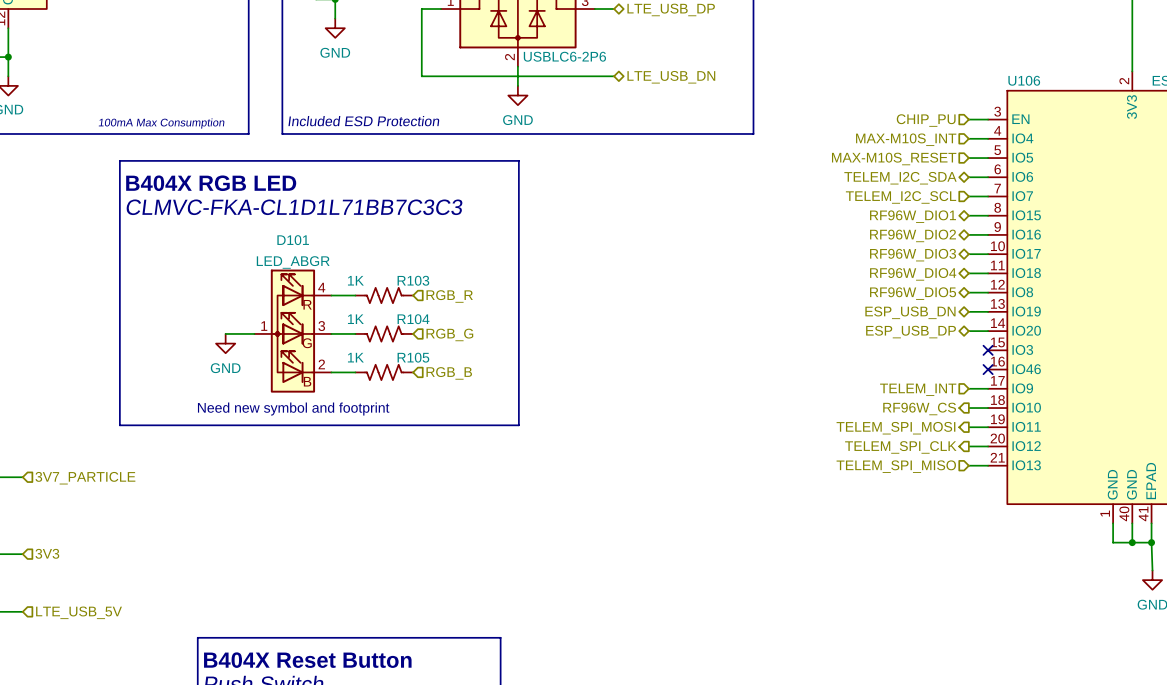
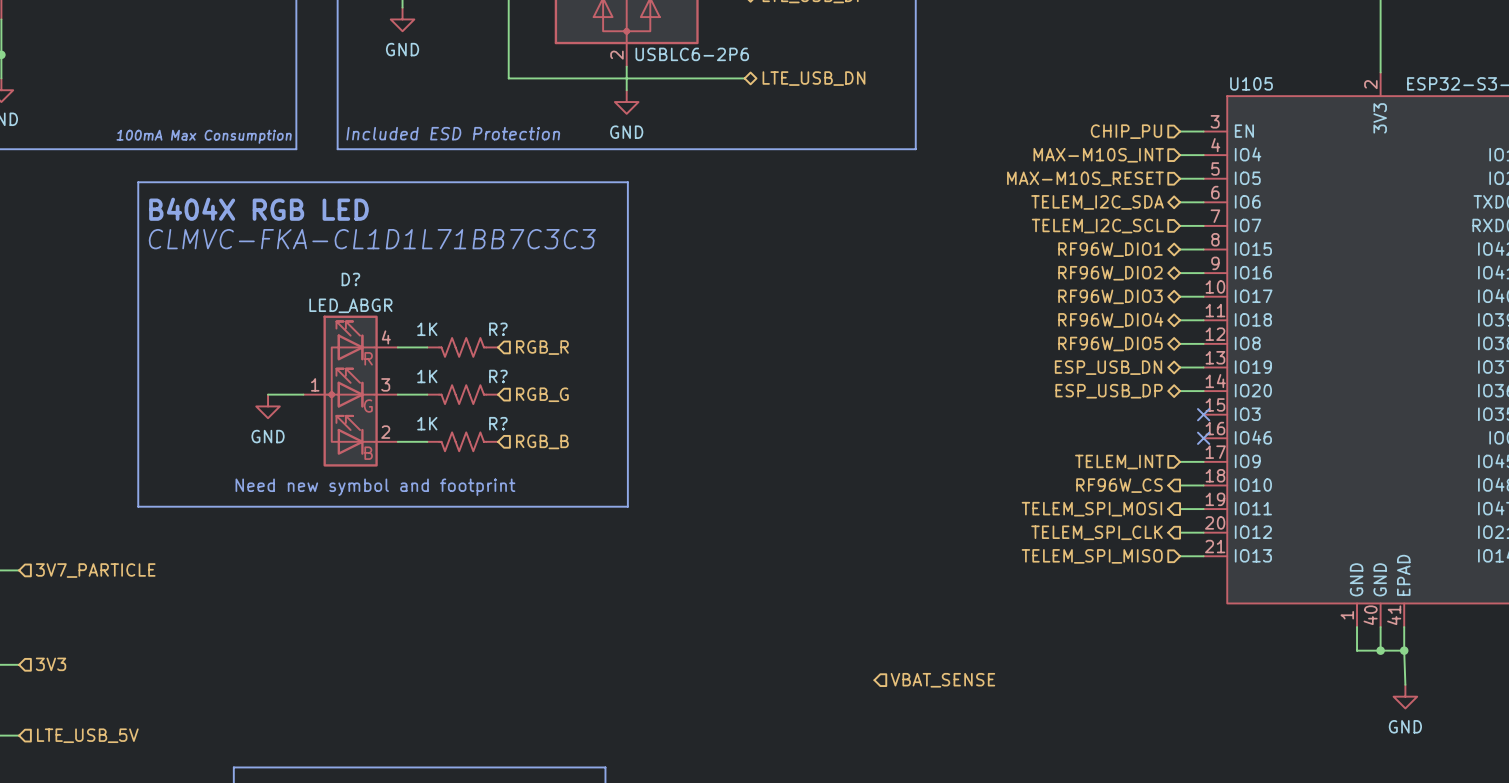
U106 name: U106 (1024, 80) -> U105 (1251, 83)
D101 name: D101 (293, 240) -> D? (350, 279)
R103 name: R103 (413, 280) -> R? (498, 329)
R104 name: R104 (413, 319) -> R? (498, 376)
R105 name: R105 (413, 357) -> R? (498, 423)
hierarchical label: none -> VBAT_SENSE (942, 680)

